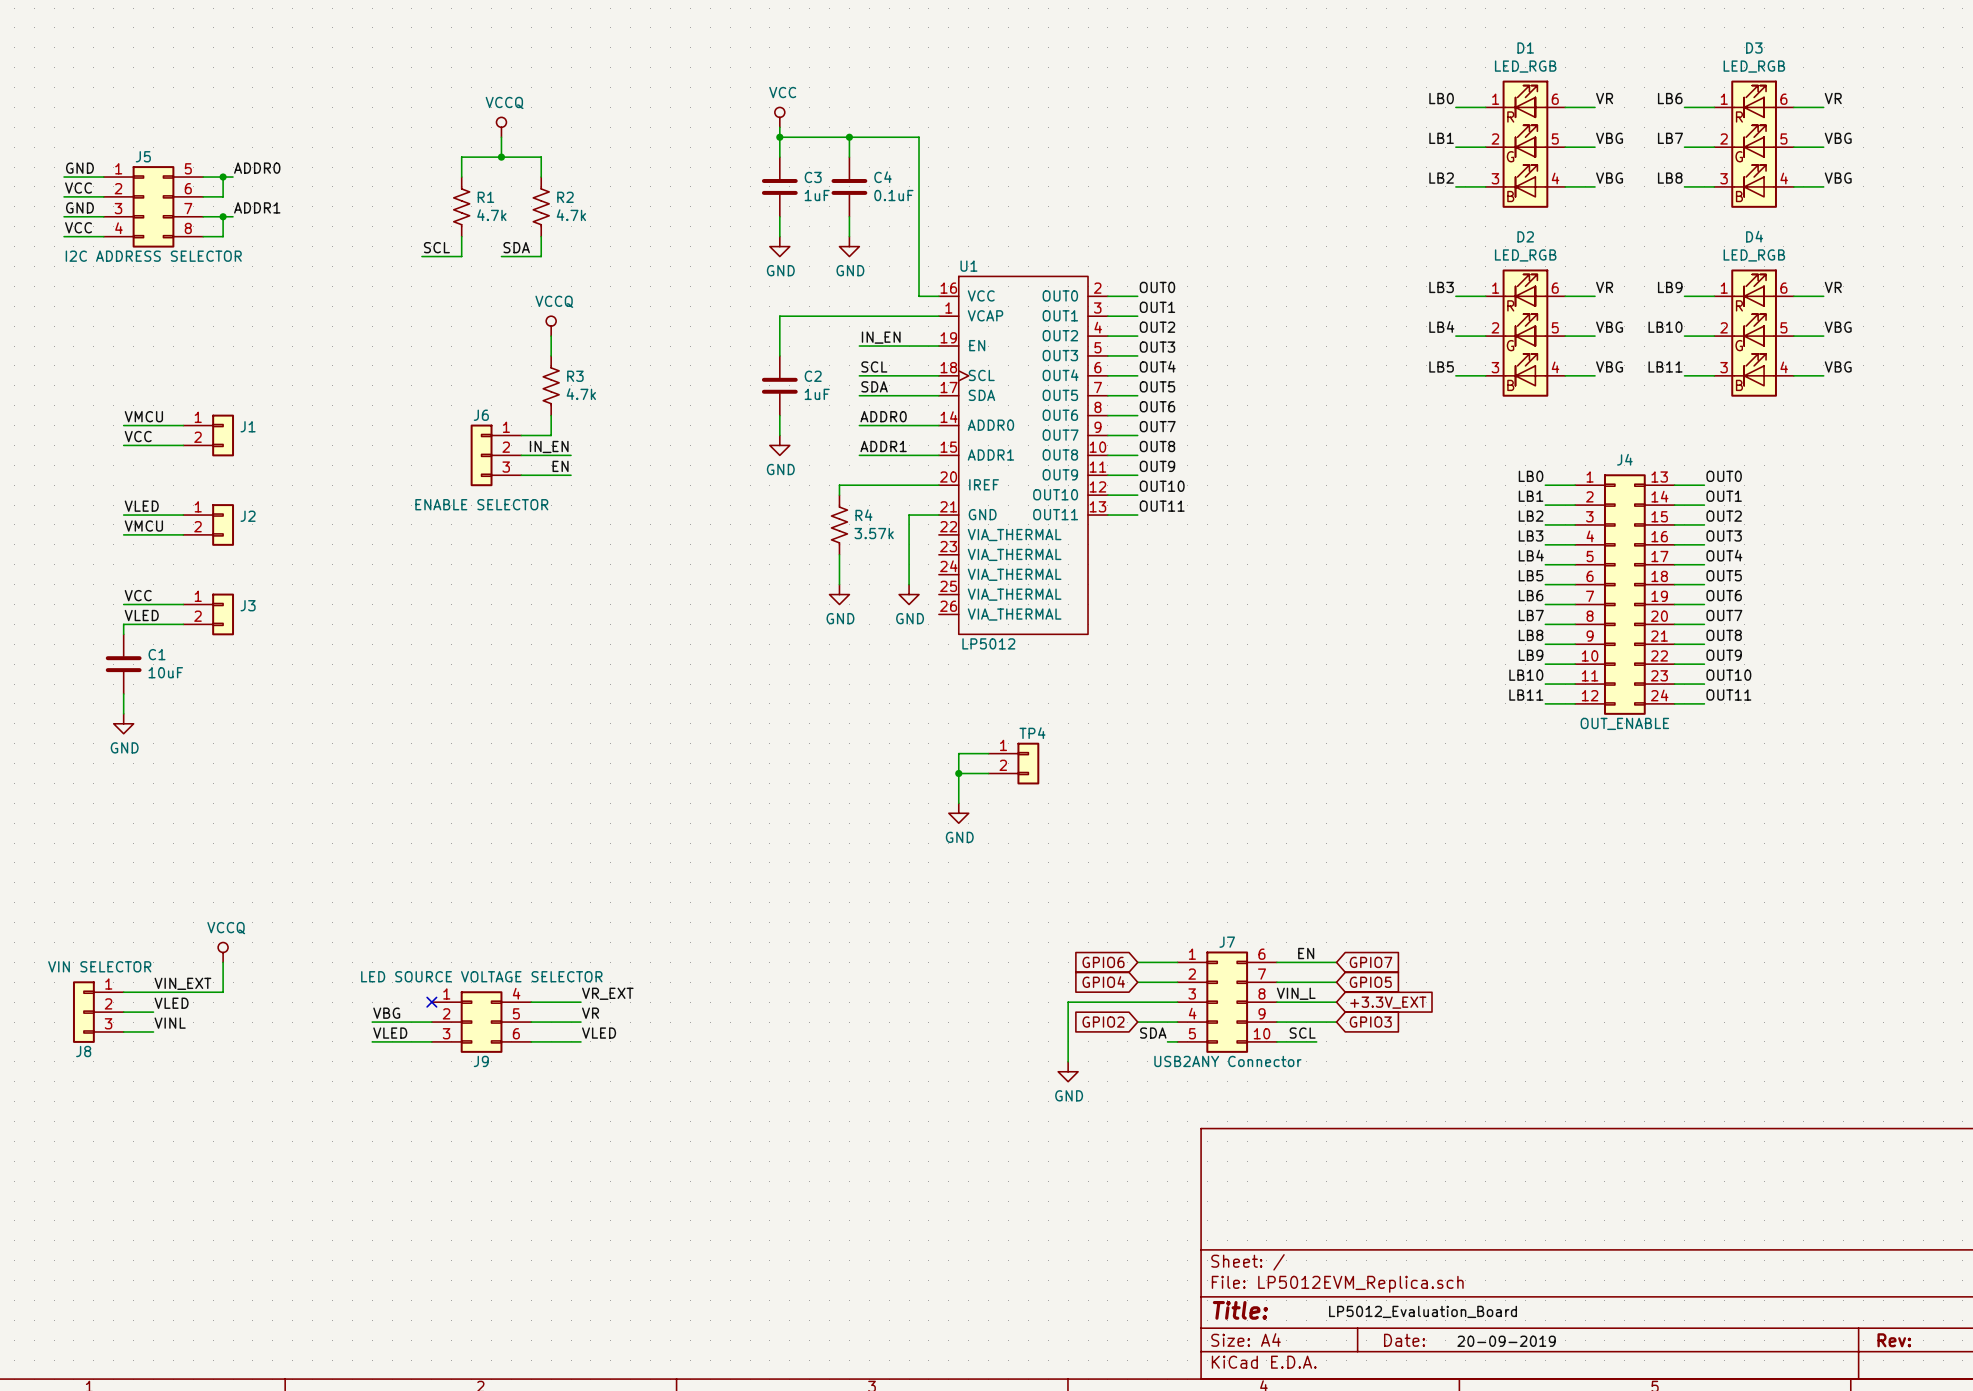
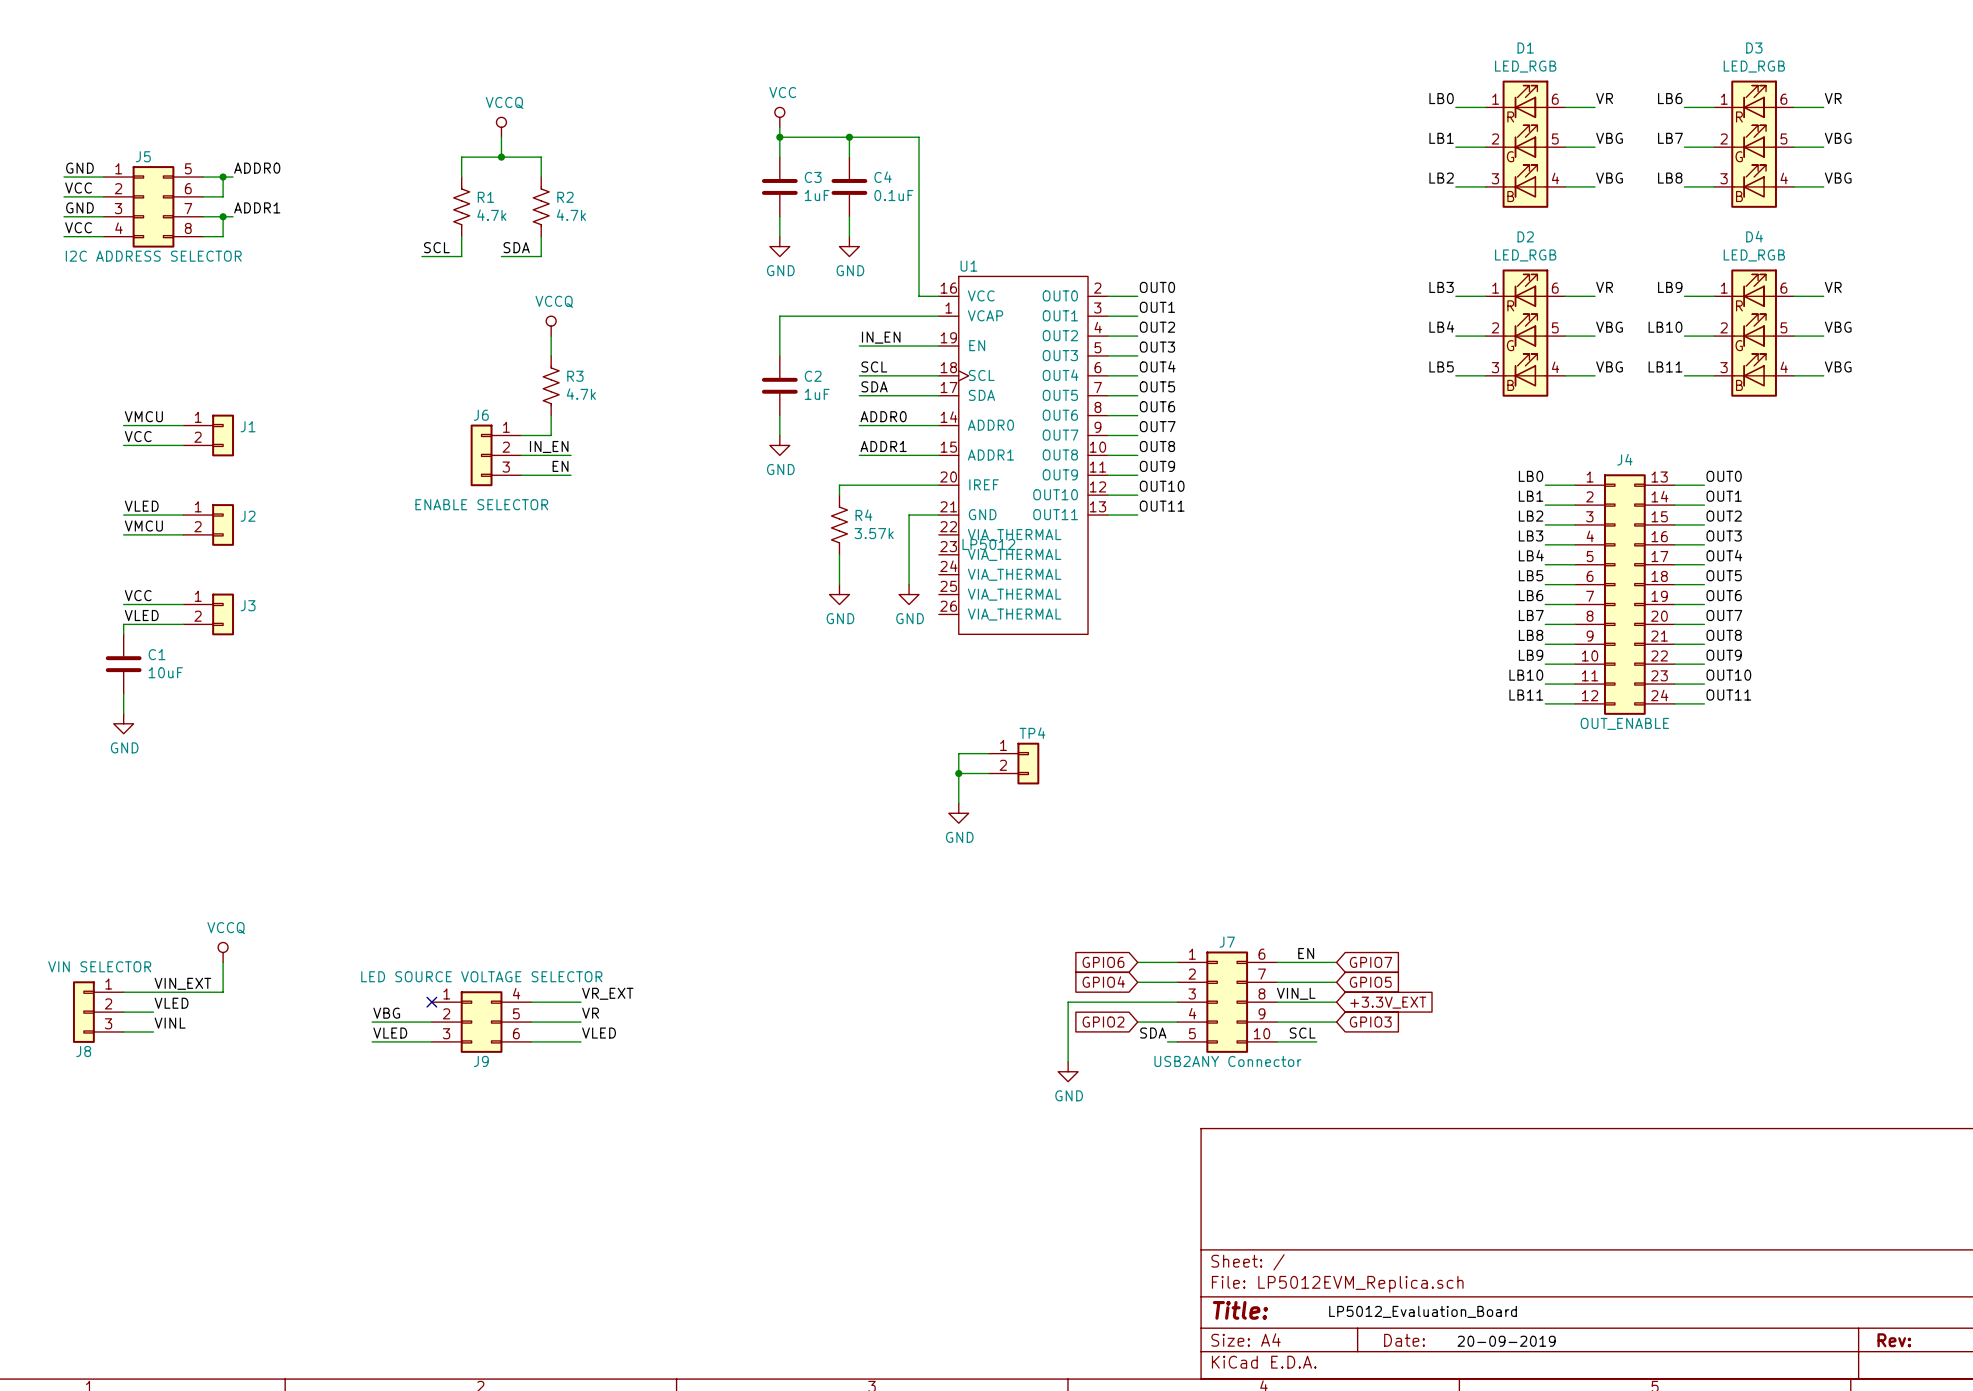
U1 value position: LP5012 (988, 643) -> LP5012 (988, 544)

